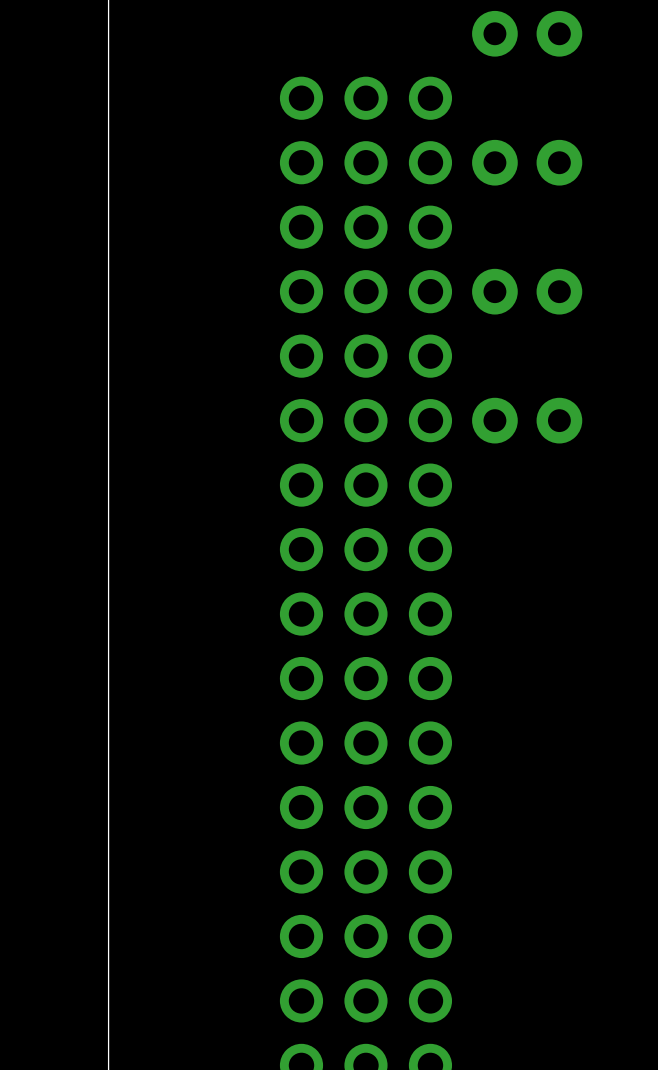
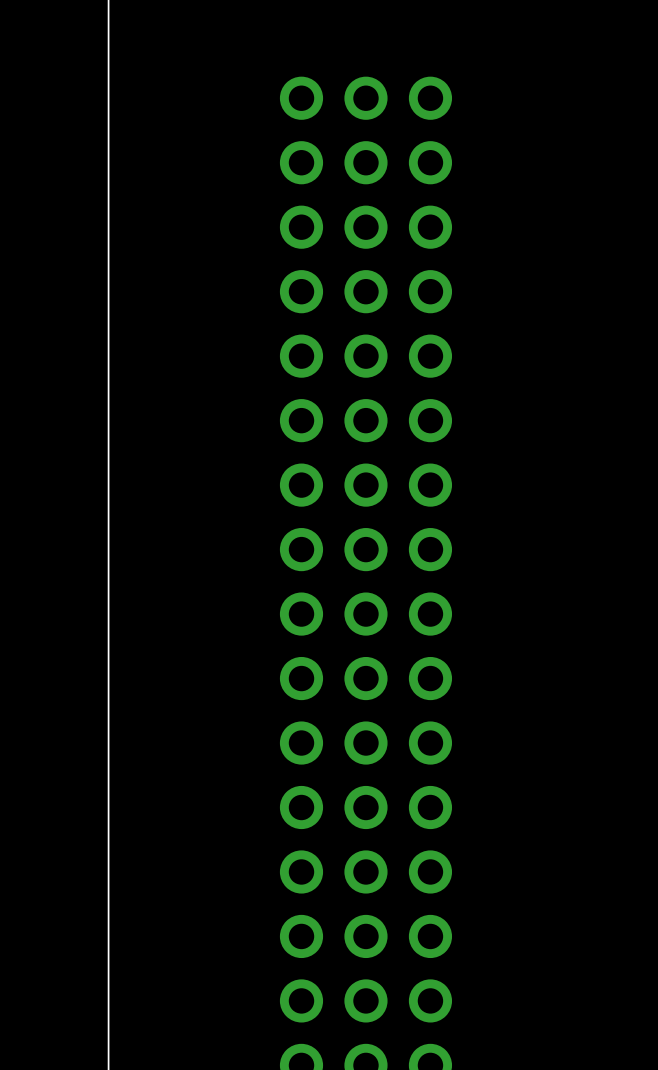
part: (527, 33) -> none
part: (527, 162) -> none
part: (527, 291) -> none
part: (527, 420) -> none

